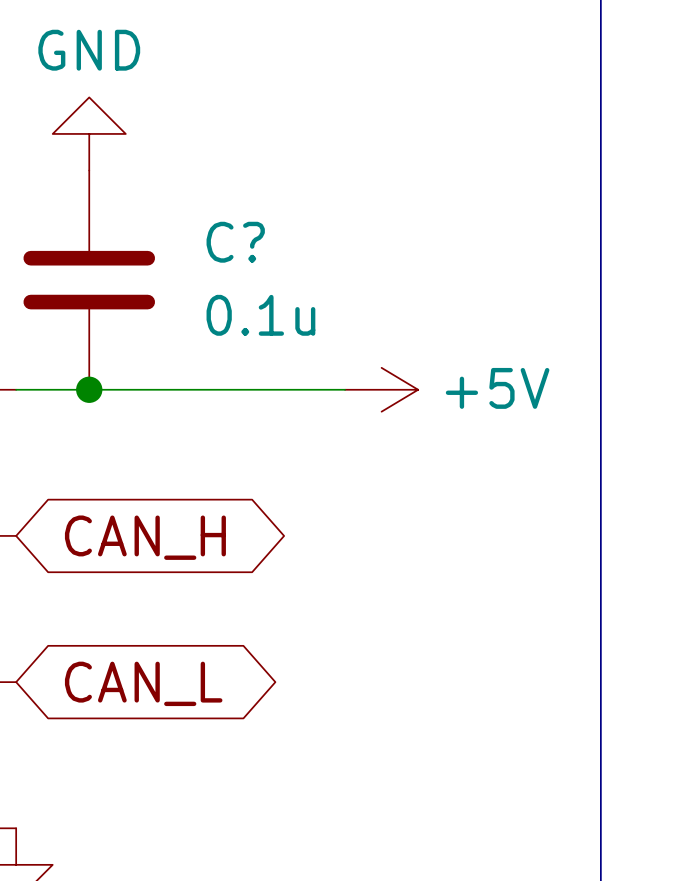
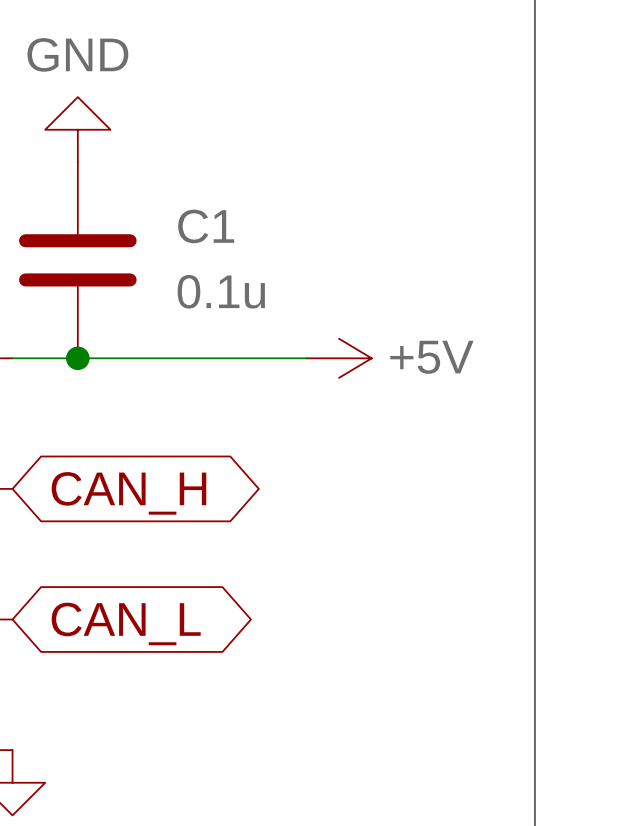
C? name: C? (235, 242) -> C1 (206, 226)

